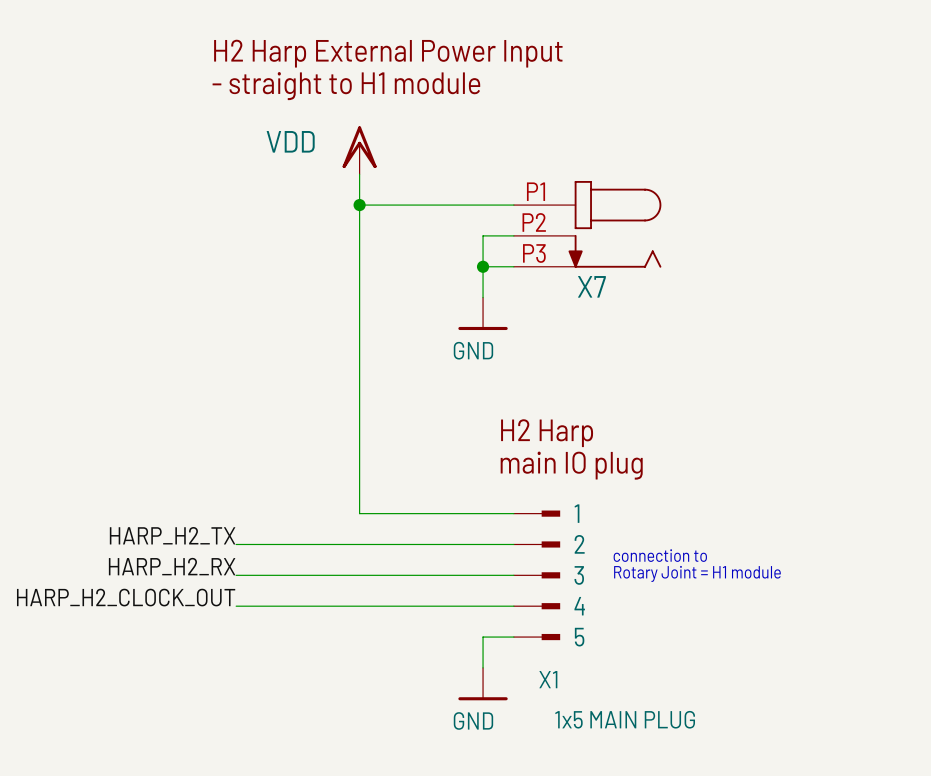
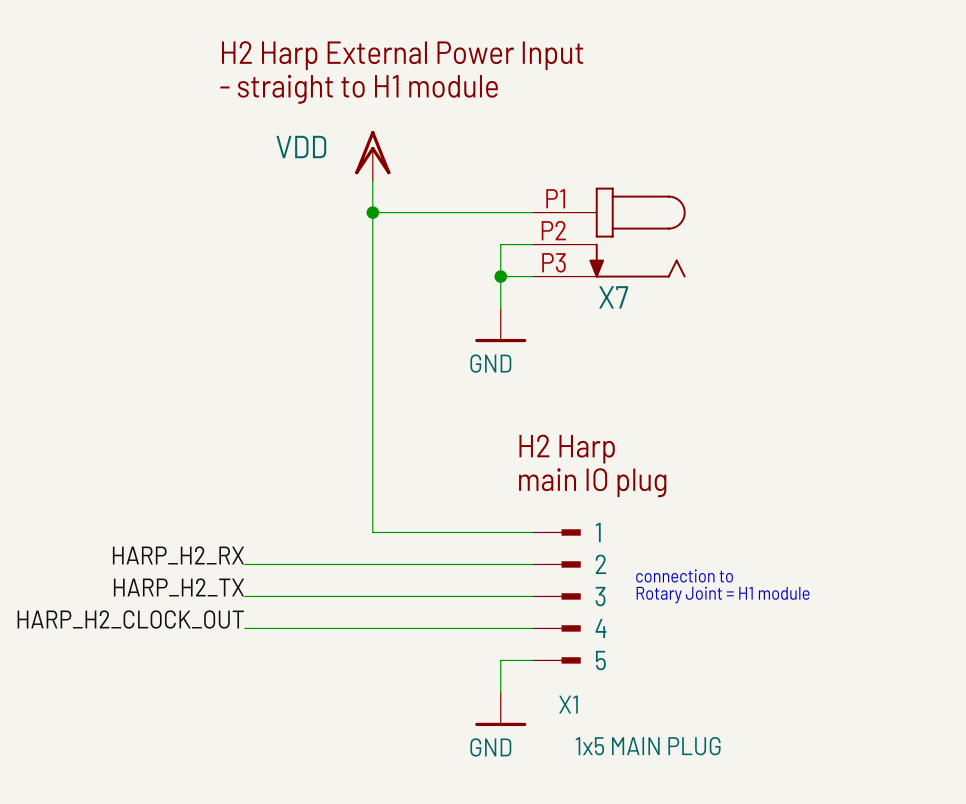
label: HARP_H2_TX (172, 535) -> HARP_H2_RX (178, 555)
label: HARP_H2_RX (172, 566) -> HARP_H2_TX (178, 587)

